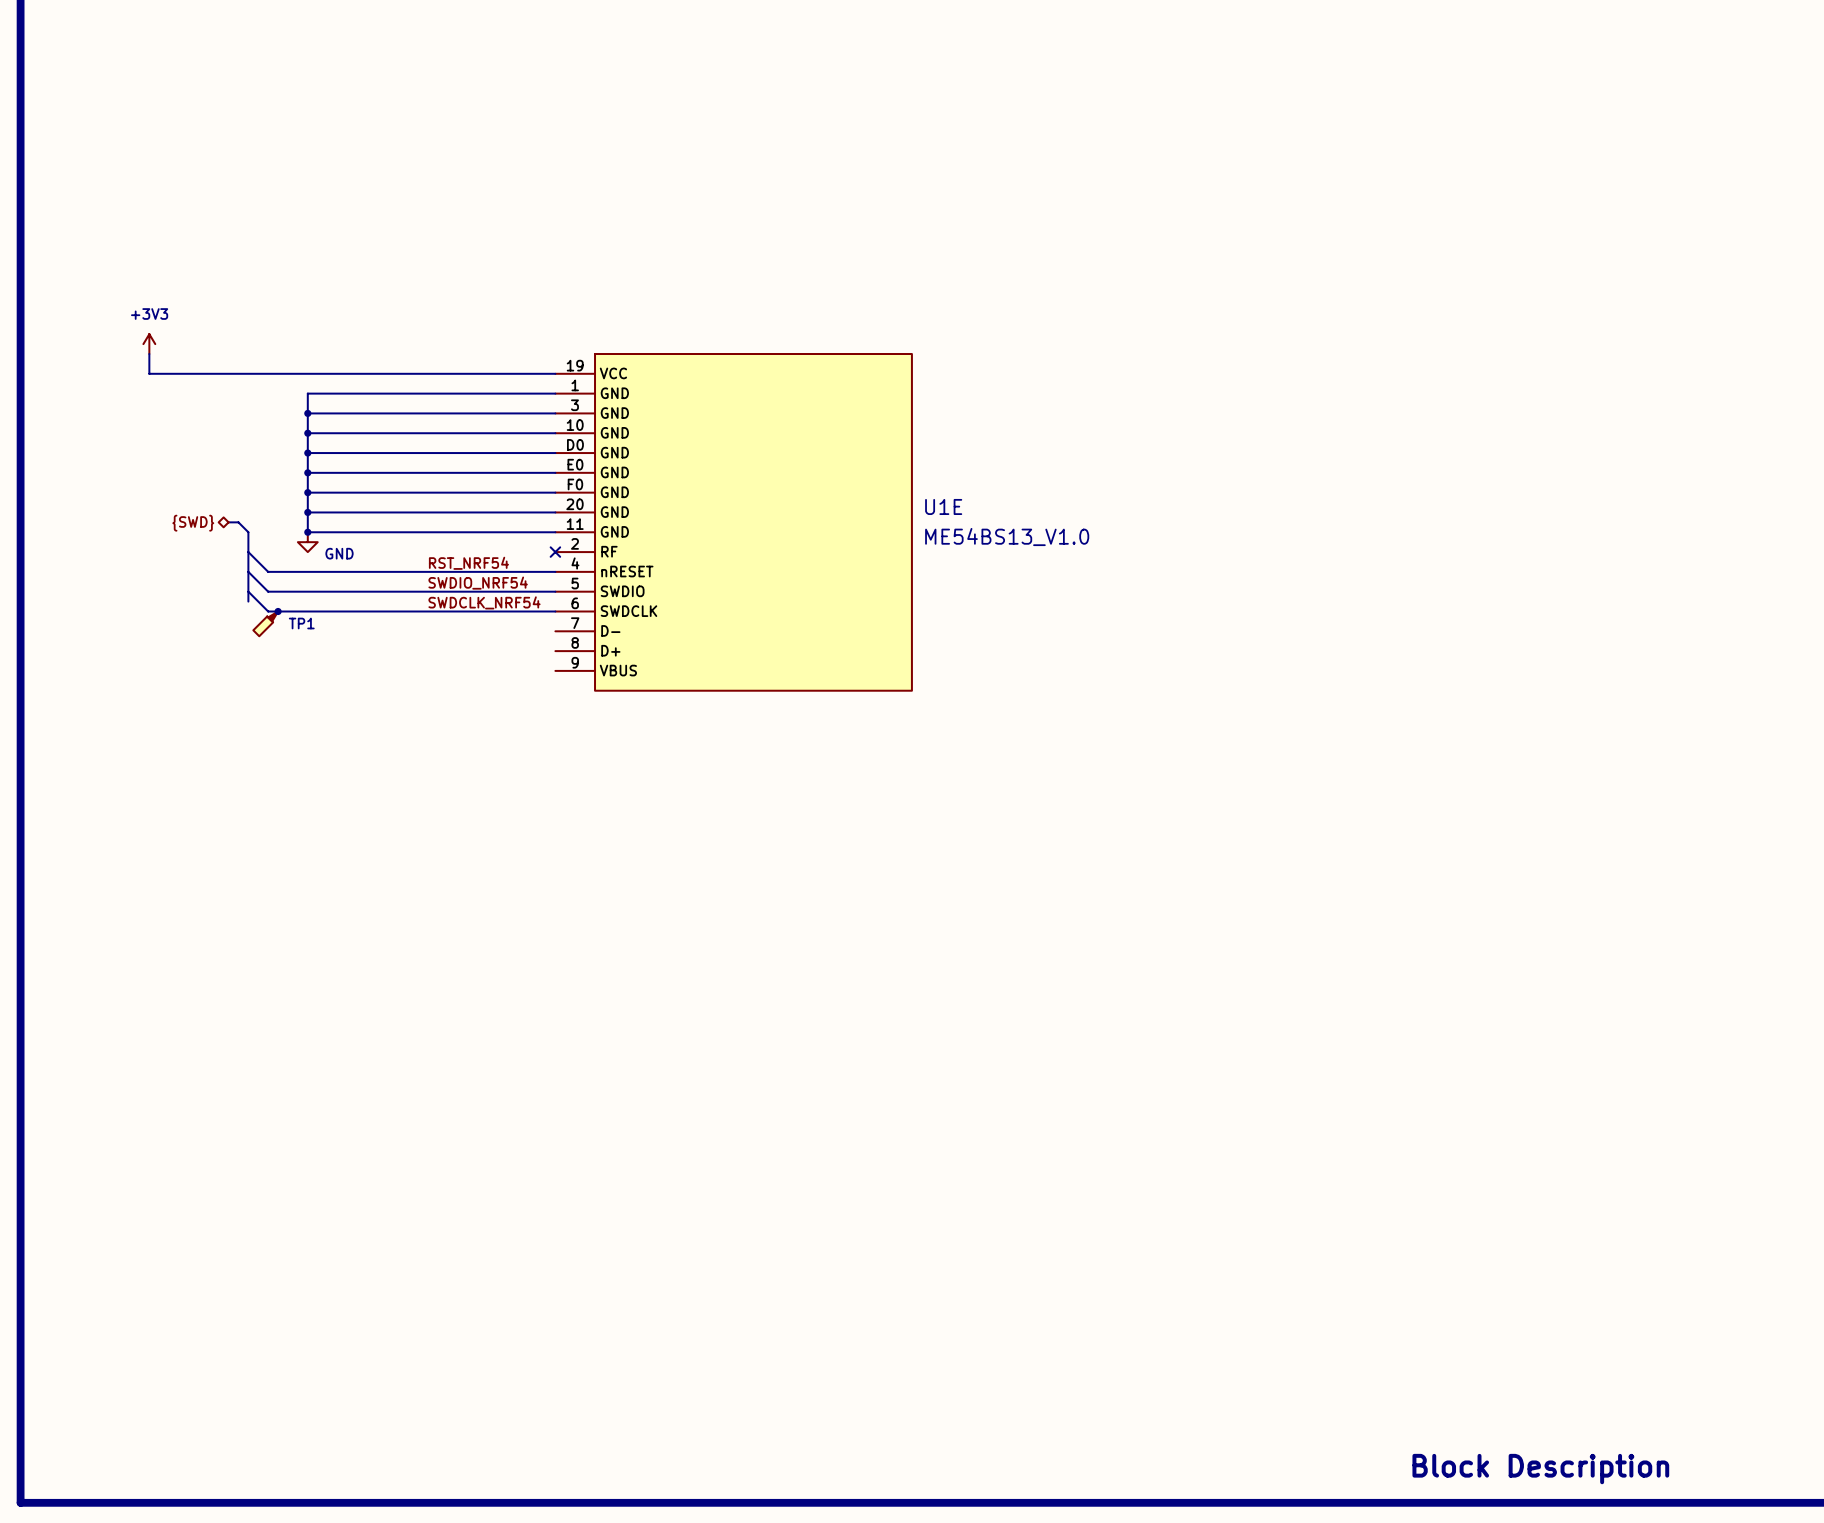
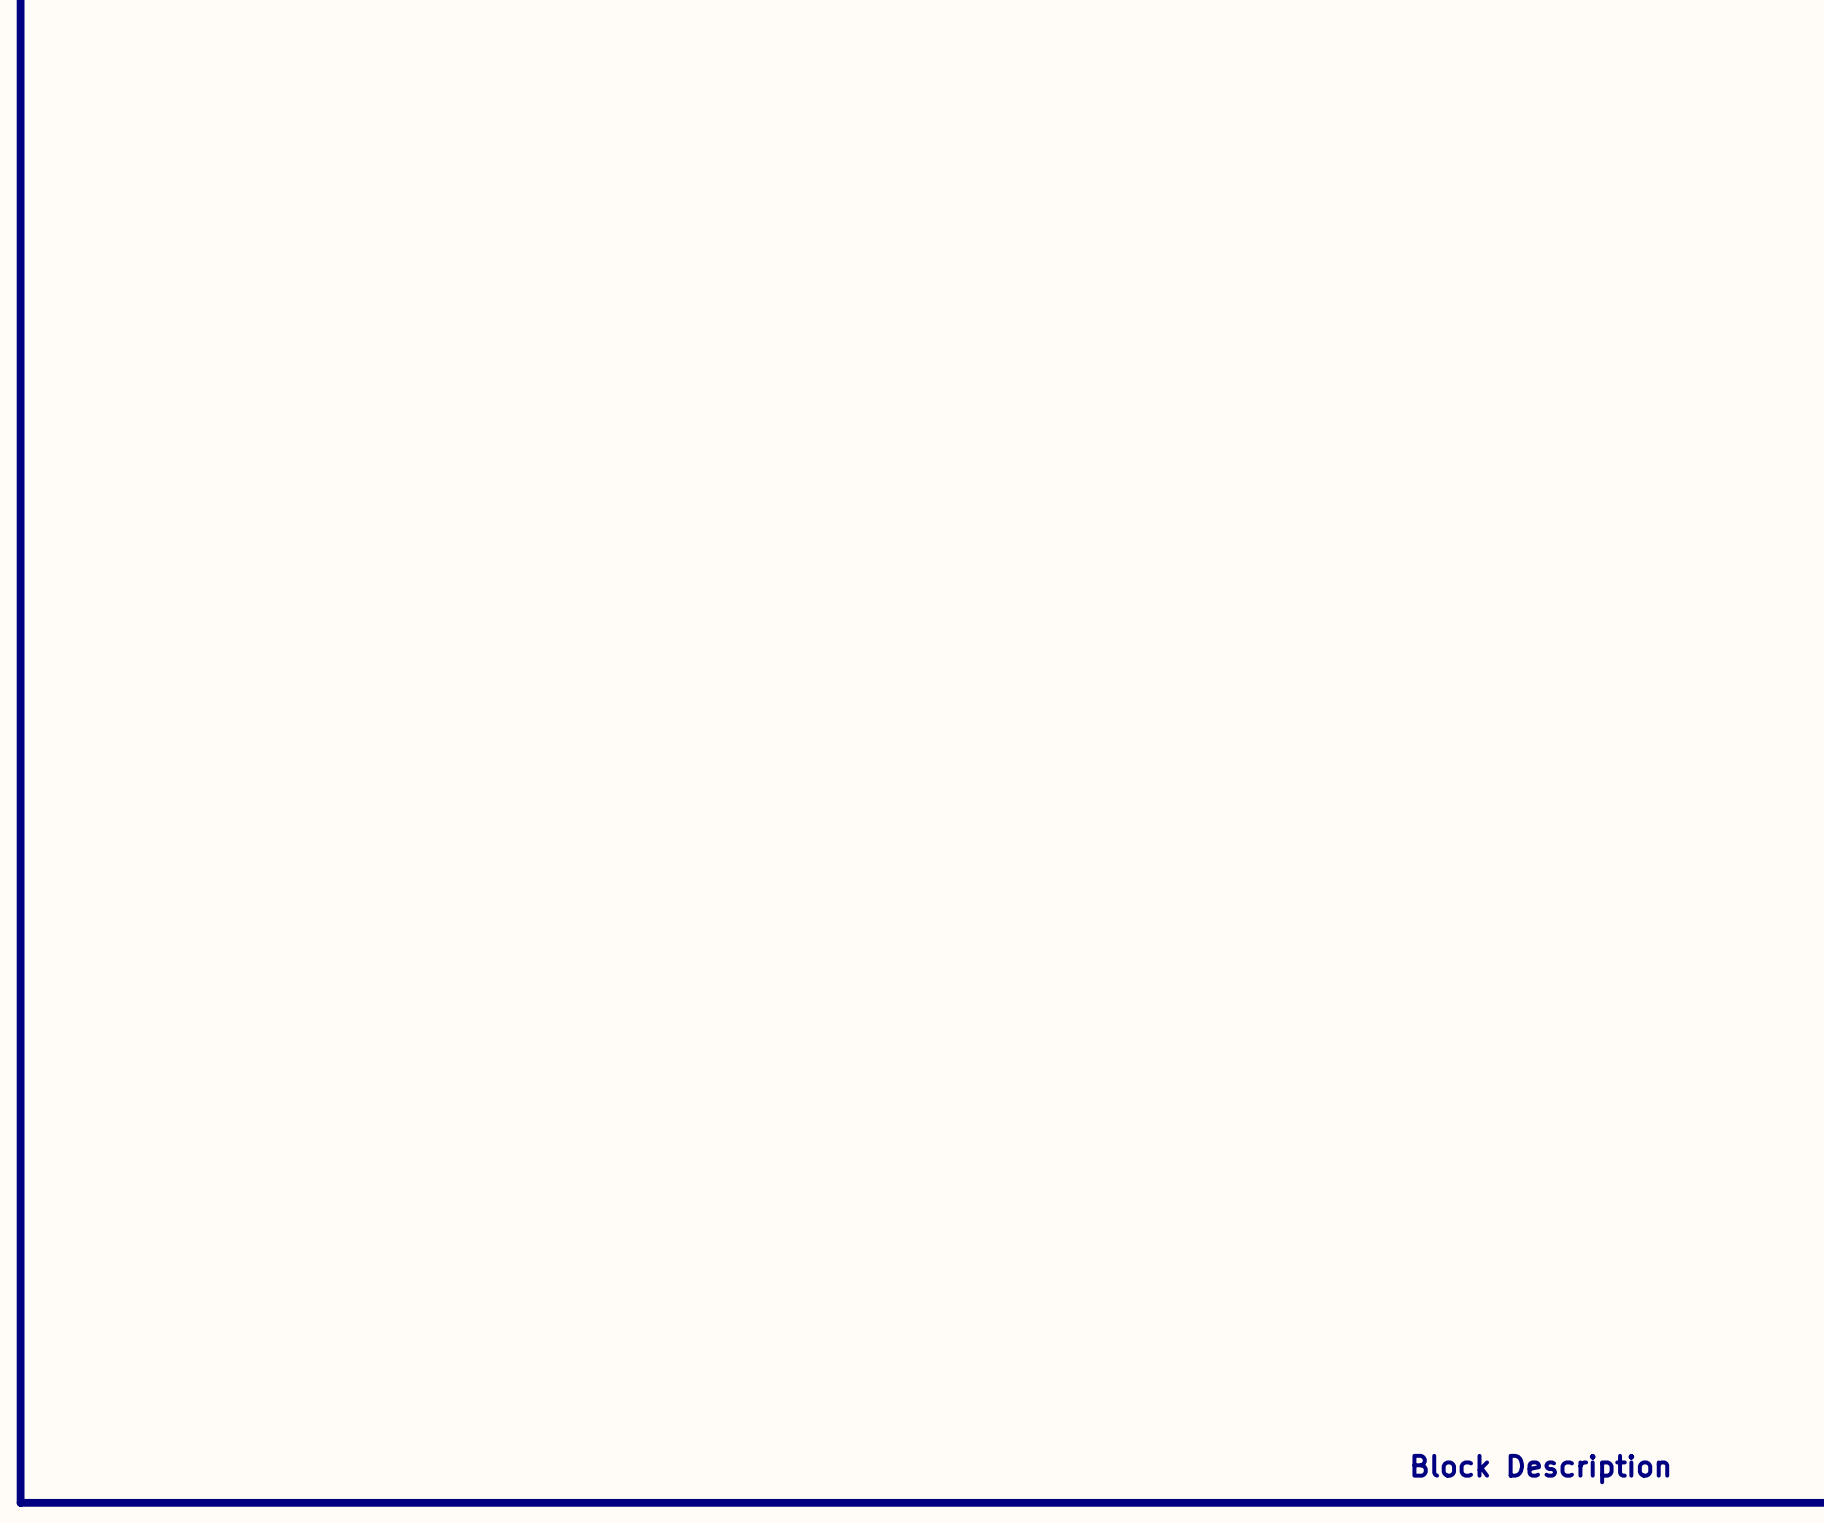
power symbol: +3V3 (149, 344) -> none
wire: (149, 354) (149, 373) (555, 373) -> none
wire: (555, 393) (307, 393) (307, 532) (555, 532) -> none
wire: (307, 413) (555, 413) -> none
junction: (307, 413) -> none
wire: (307, 433) (555, 433) -> none
junction: (307, 433) -> none
wire: (307, 453) (555, 453) -> none
junction: (307, 453) -> none
wire: (307, 472) (555, 472) -> none
junction: (307, 472) -> none
wire: (307, 492) (555, 492) -> none
junction: (307, 492) -> none
wire: (307, 512) (555, 512) -> none
junction: (307, 512) -> none
bus: (228, 522) (238, 522) (248, 532) (248, 601) -> none
U1E: ME54BS13_V1.0 (733, 522) -> none
hierarchical label: {SWD} (193, 523) -> none
junction: (307, 532) -> none
power symbol: GND (307, 542) -> none
wire: (248, 552) (268, 571) (555, 571) -> none
no-connect mark: (555, 552) -> none
label: RST_NRF54 (468, 563) -> none
wire: (248, 571) (268, 591) (555, 591) -> none
label: SWDIO_NRF54 (478, 583) -> none
wire: (248, 591) (268, 611) (555, 611) -> none
label: SWDCLK_NRF54 (484, 602) -> none
junction: (278, 611) -> none
TP1: (265, 623) -> none

